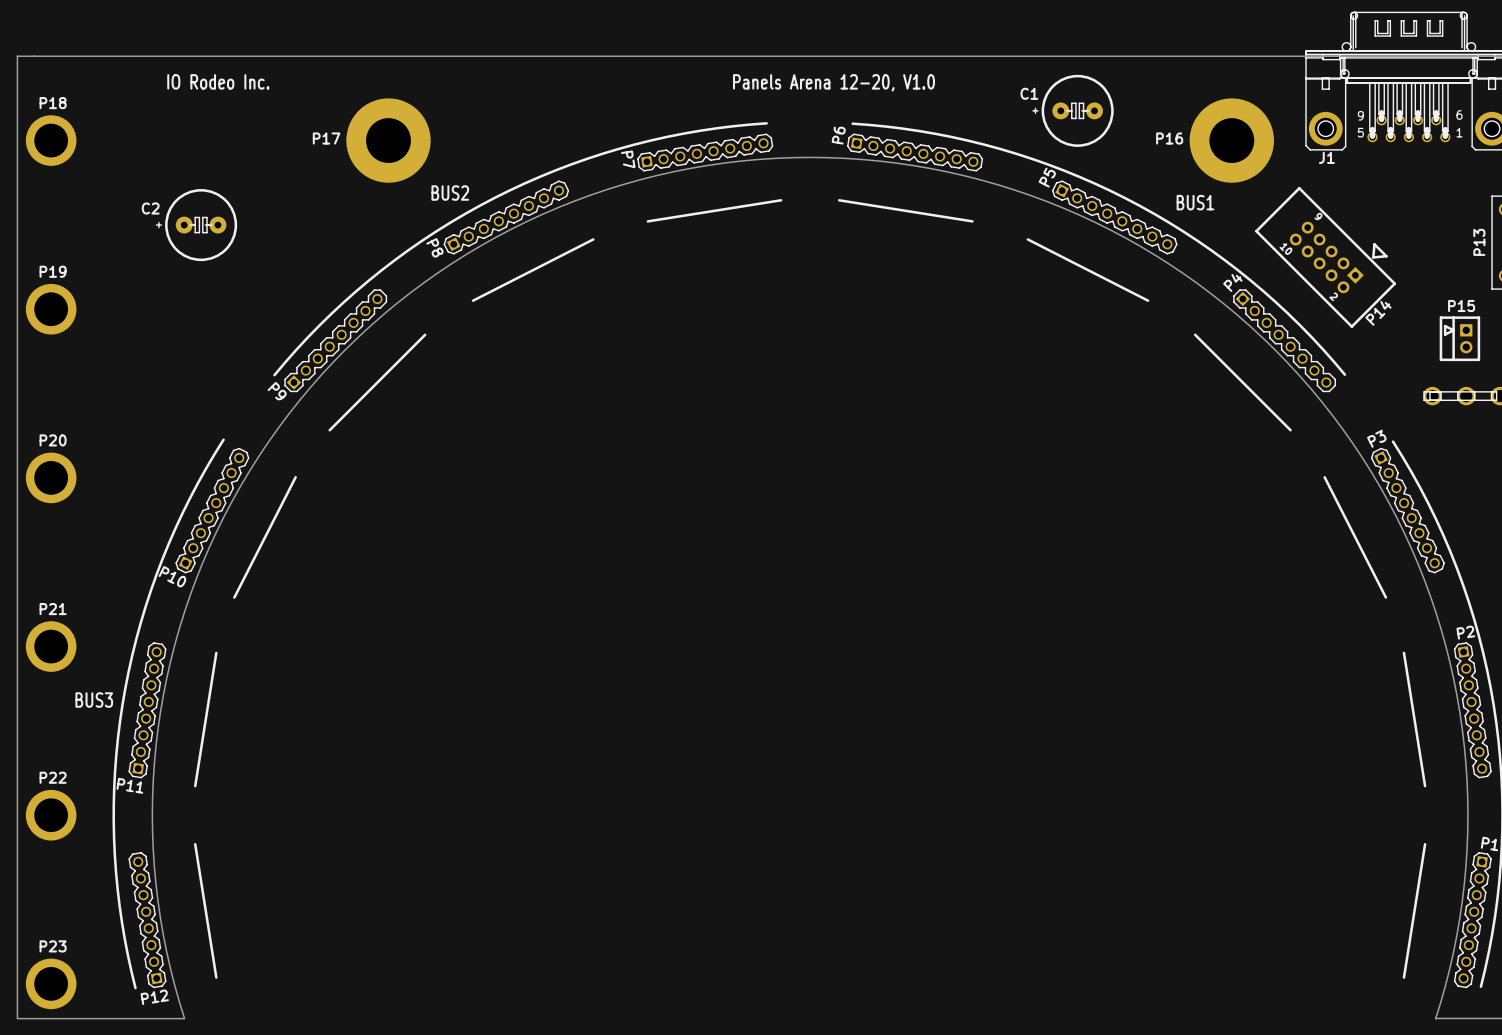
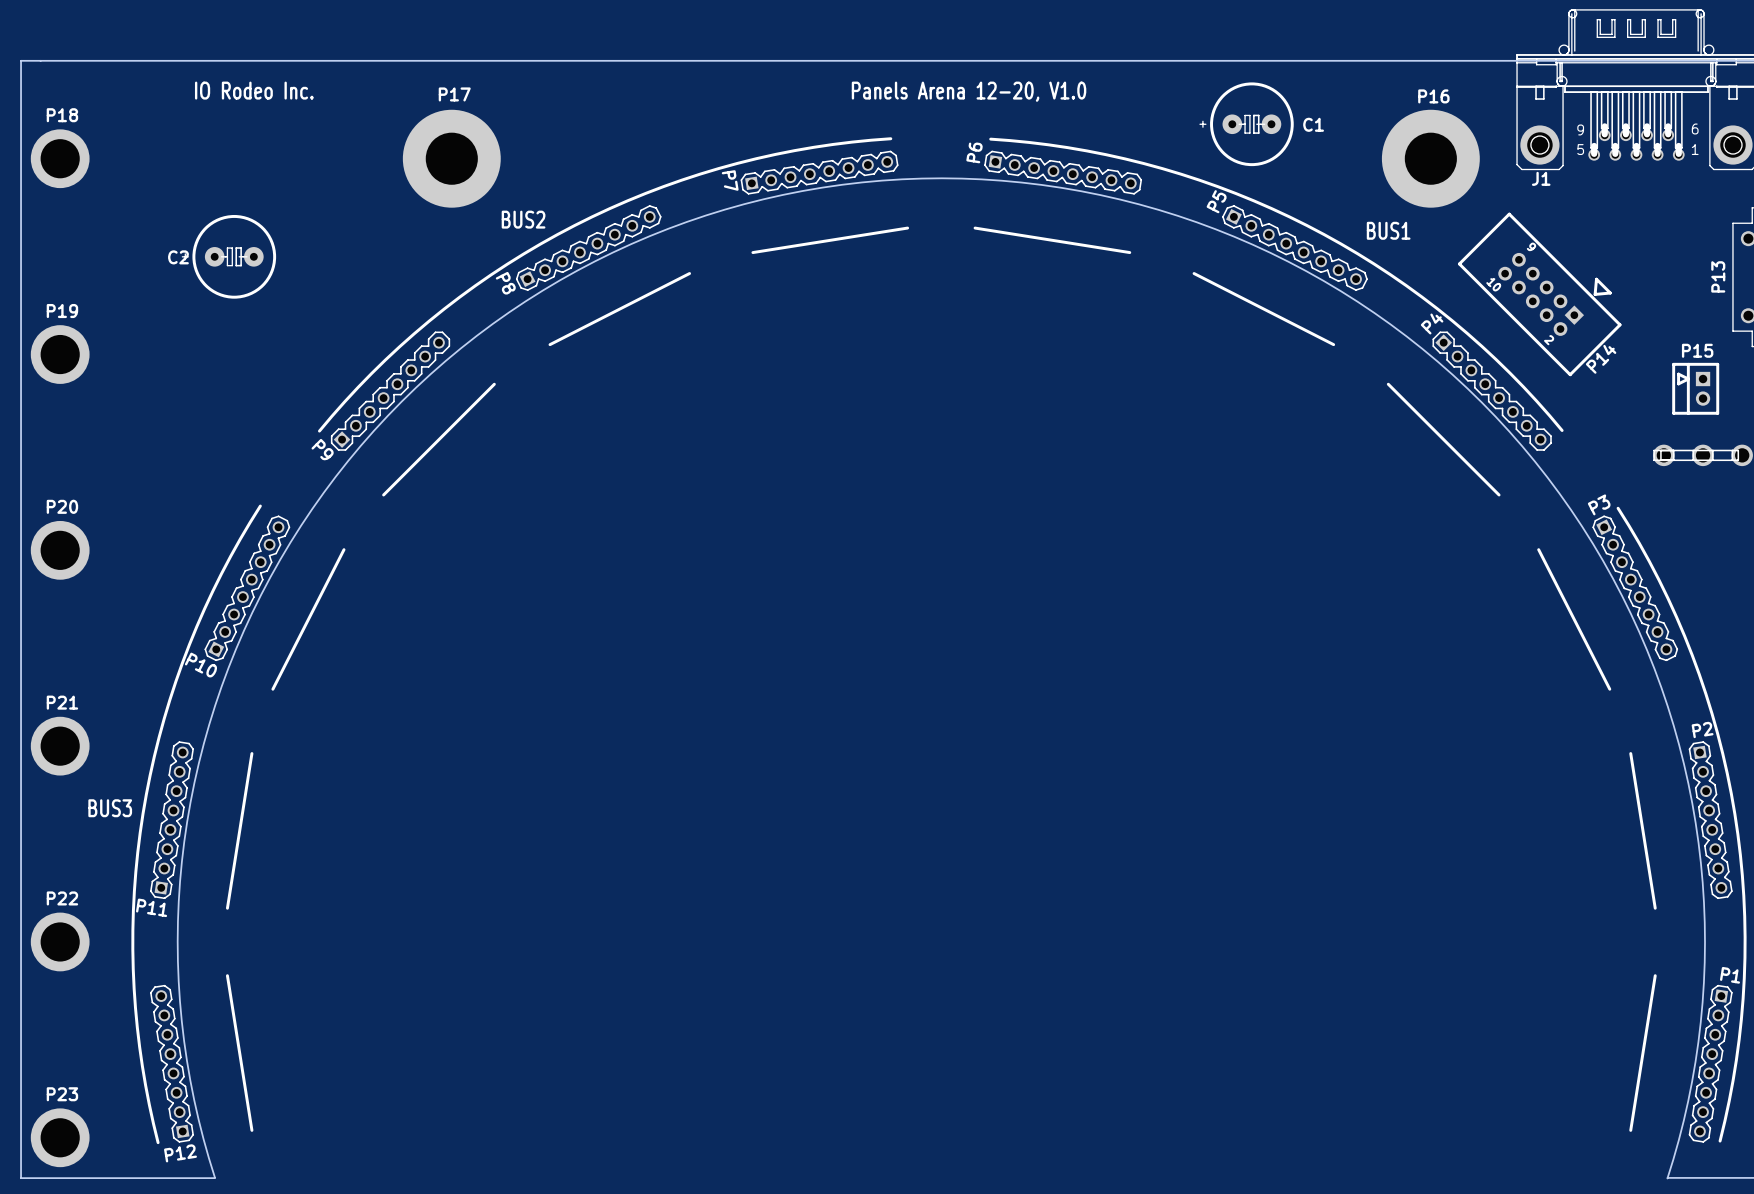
C1 name position: C1 (1029, 93) -> C1 (1313, 124)
P17 name position: P17 (326, 138) -> P17 (454, 94)
P16 name position: P16 (1169, 138) -> P16 (1433, 96)
C2 name position: C2 (150, 208) -> C2 (178, 257)

